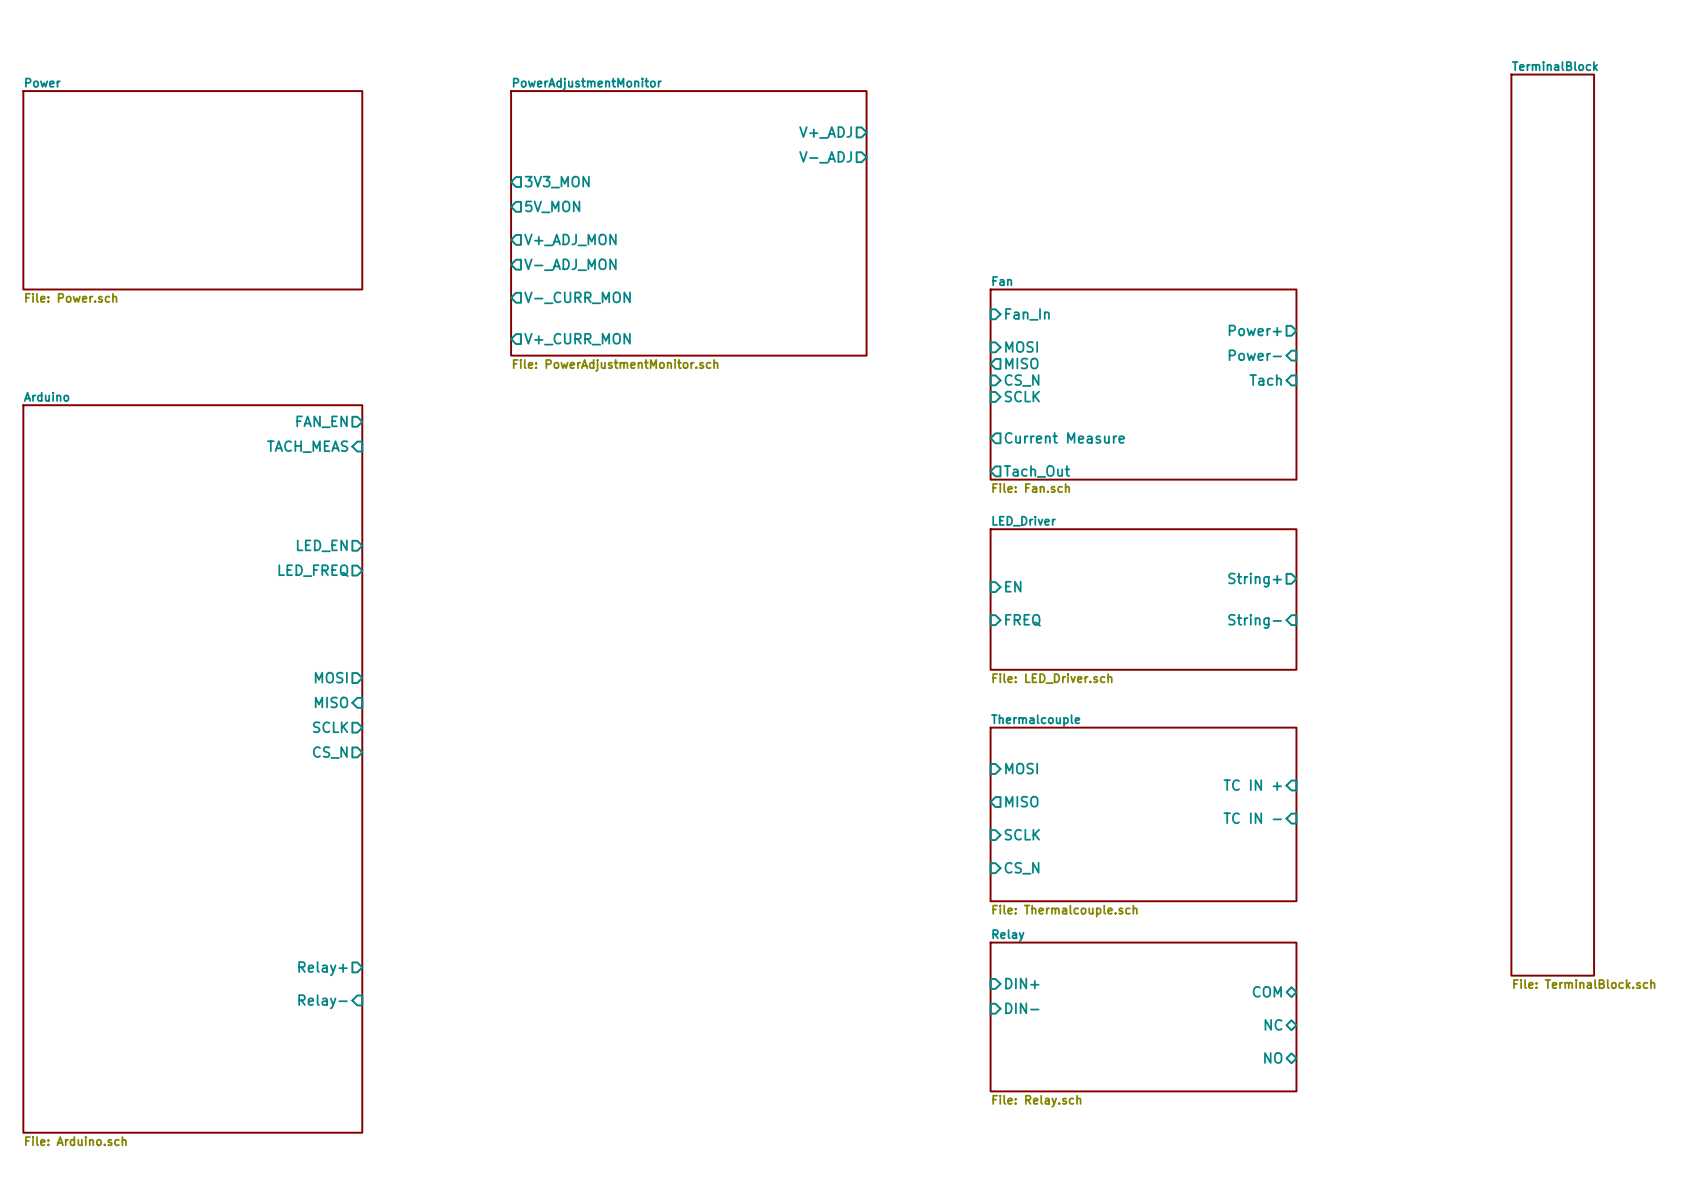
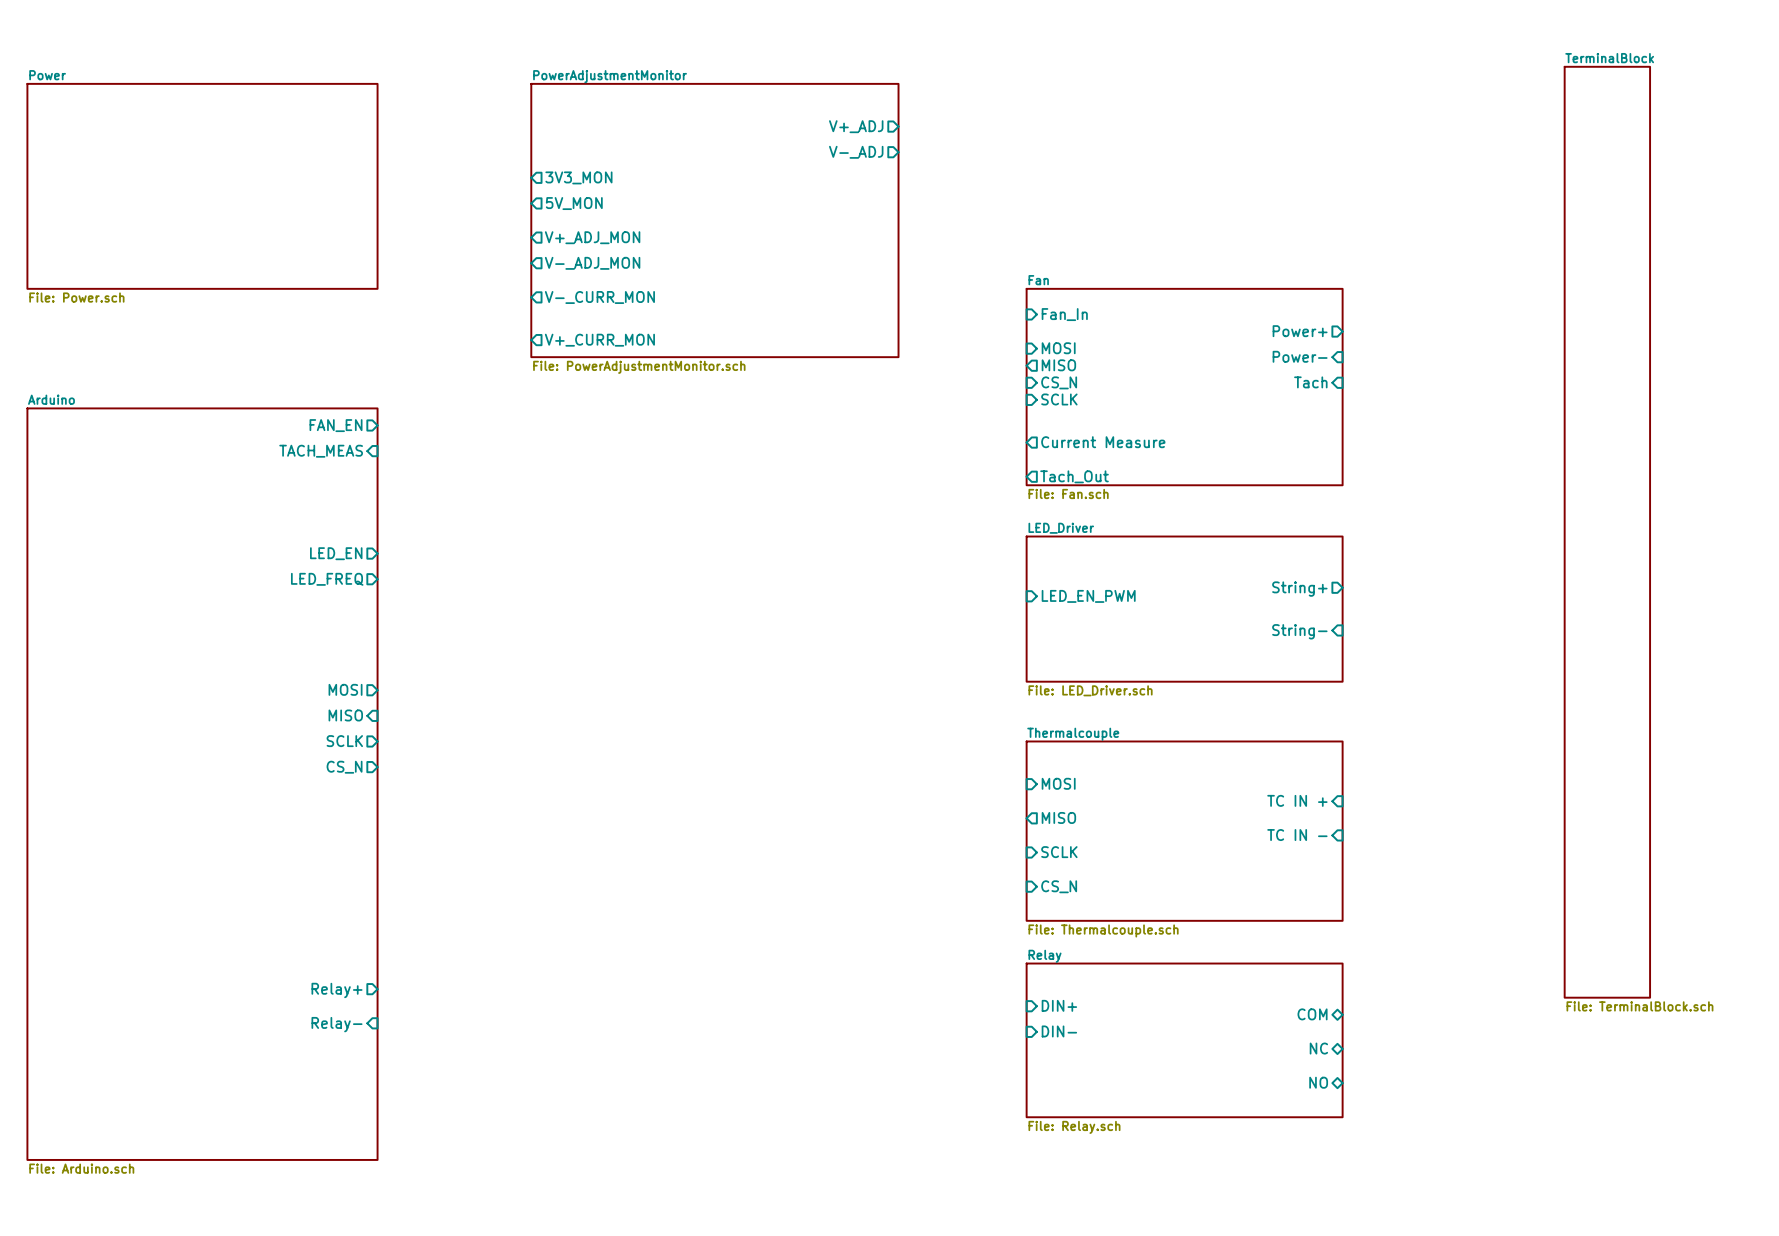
sheet pin: EN (1013, 586) -> LED_EN_PWM (1088, 596)
sheet pin: FREQ (1023, 620) -> none

